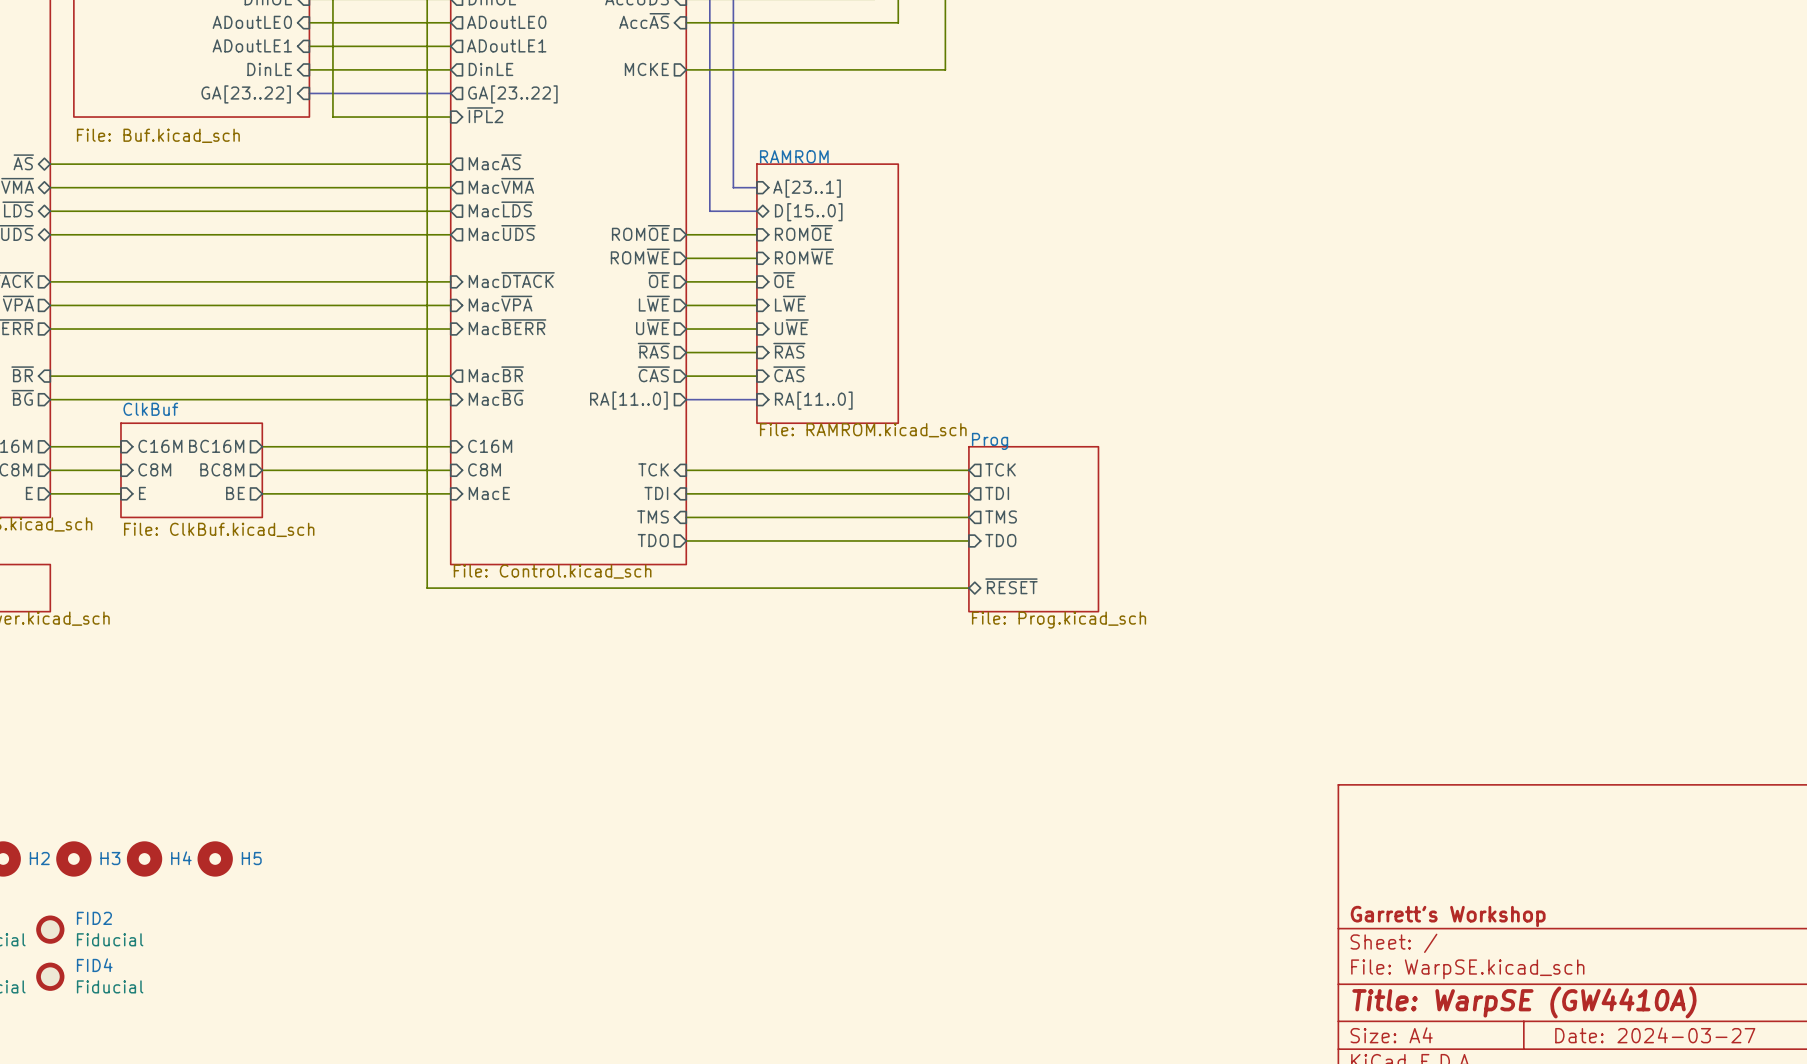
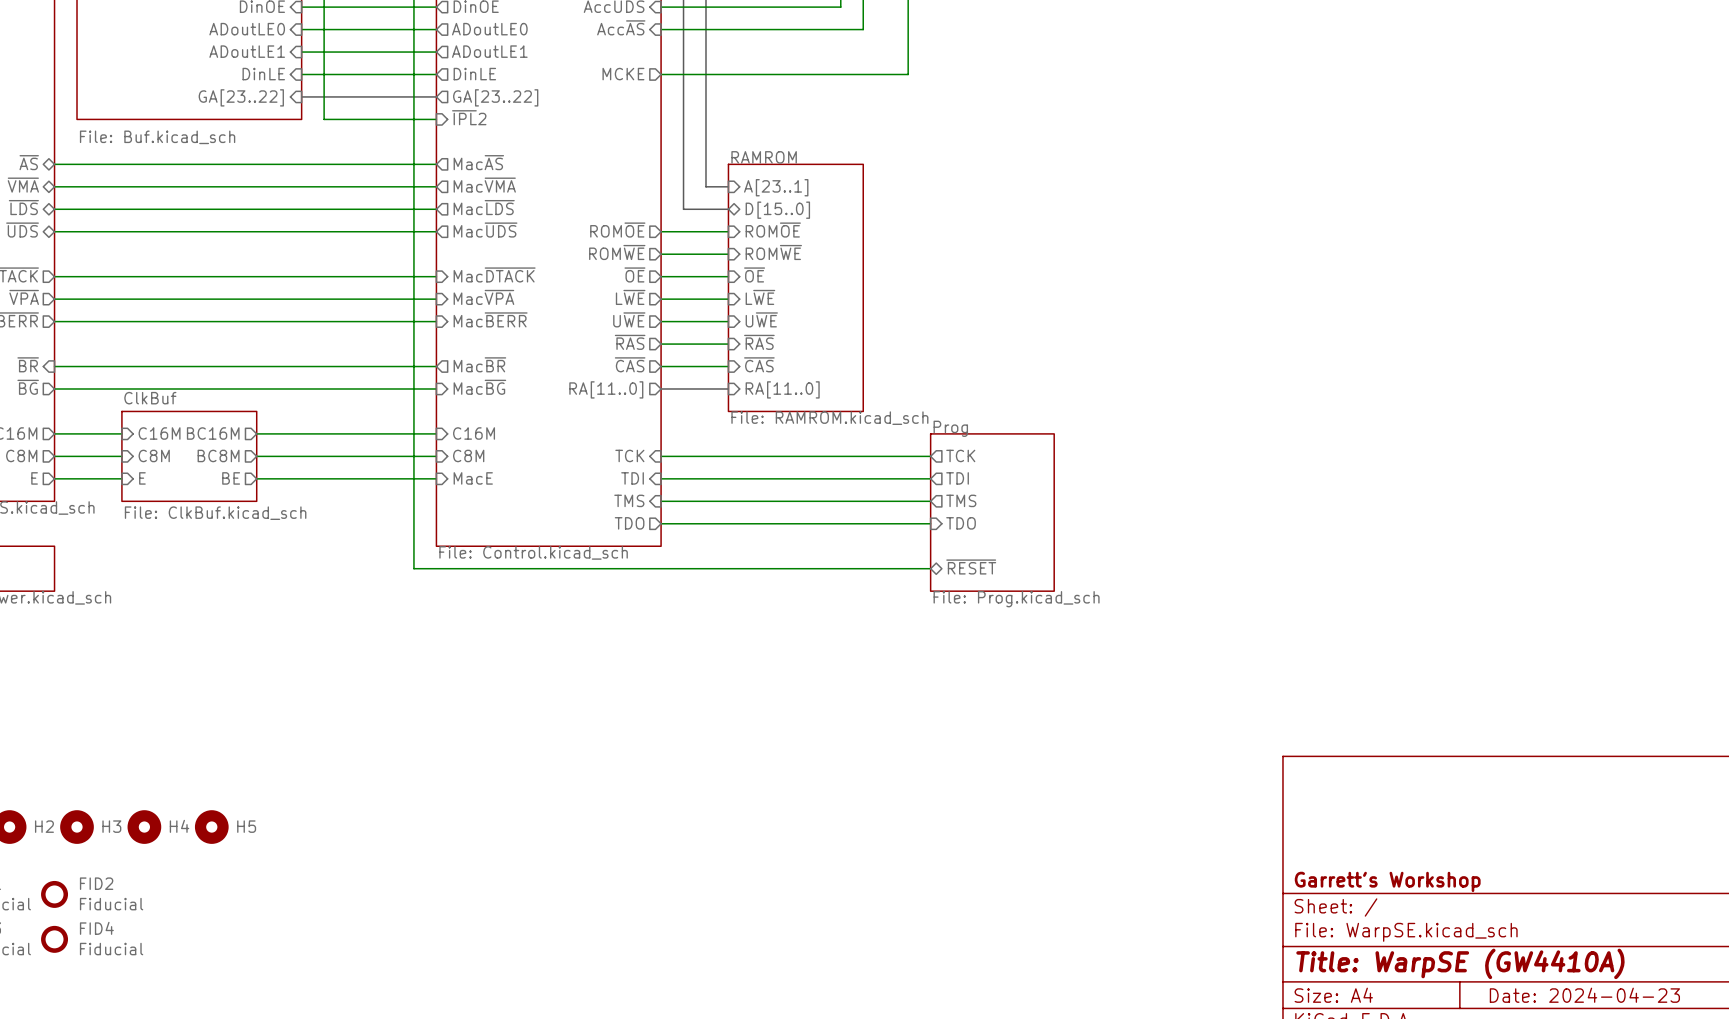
title block: Date: 2024-03-27 (1655, 1035) -> Date: 2024-04-23 (1584, 995)

